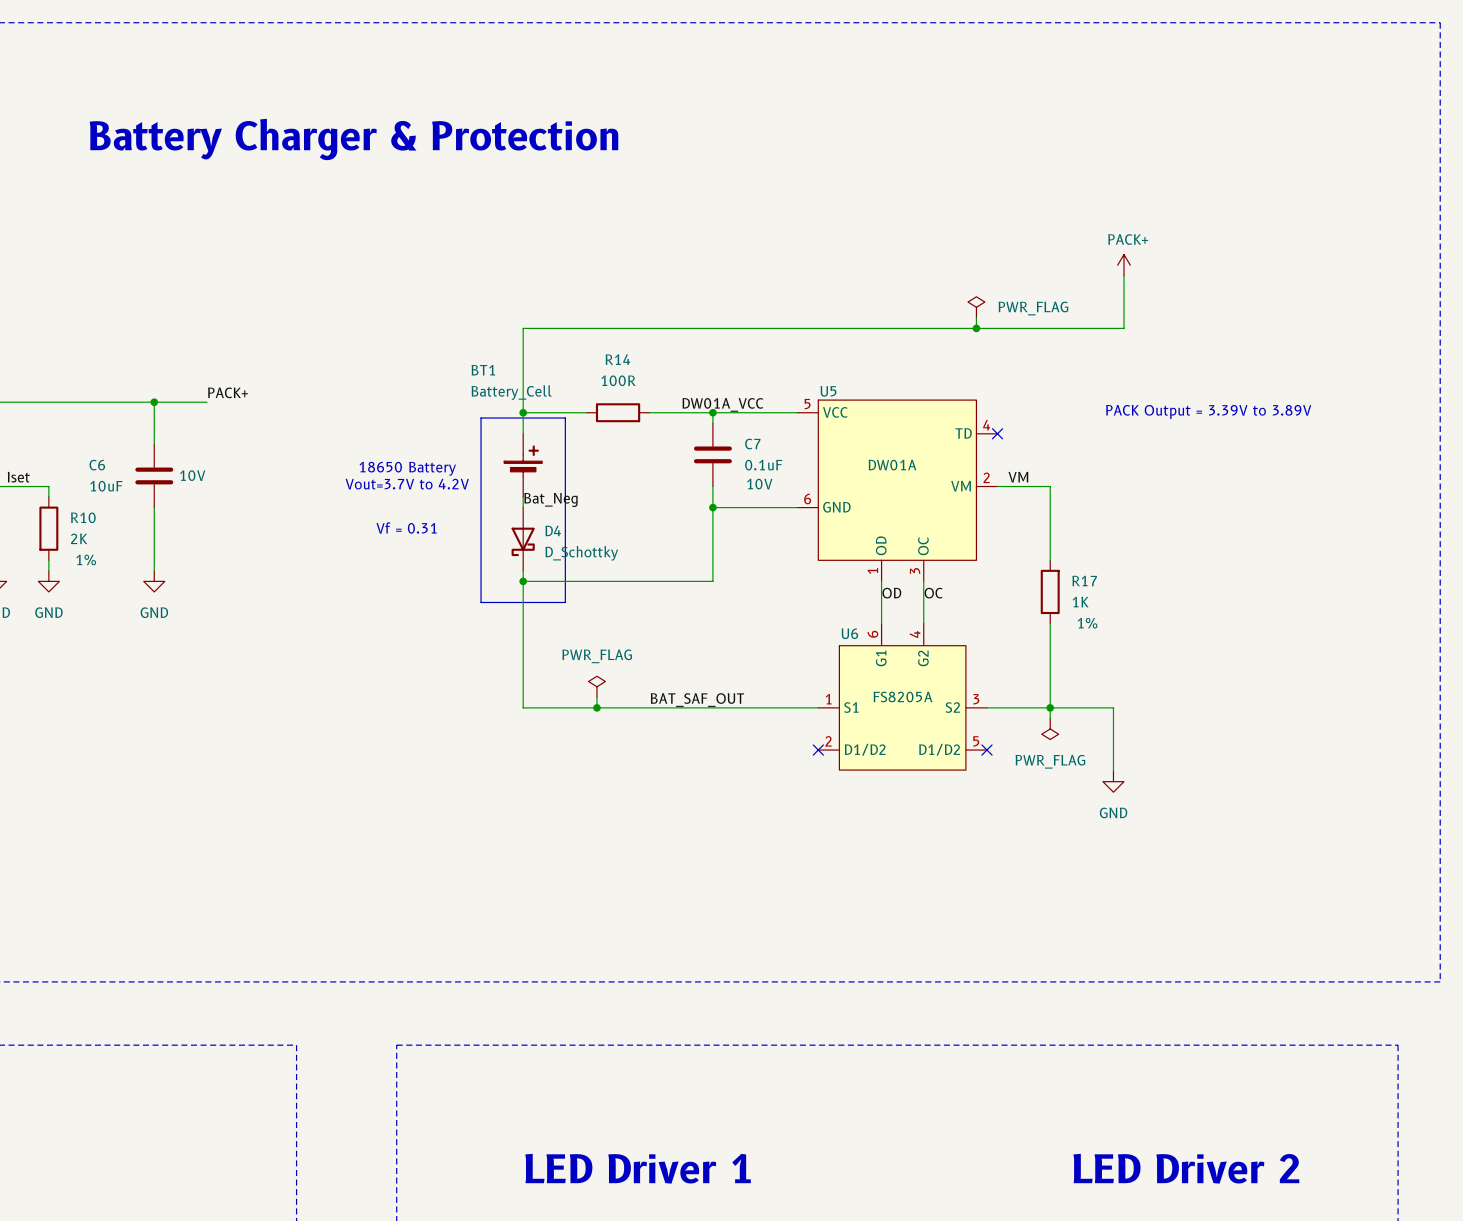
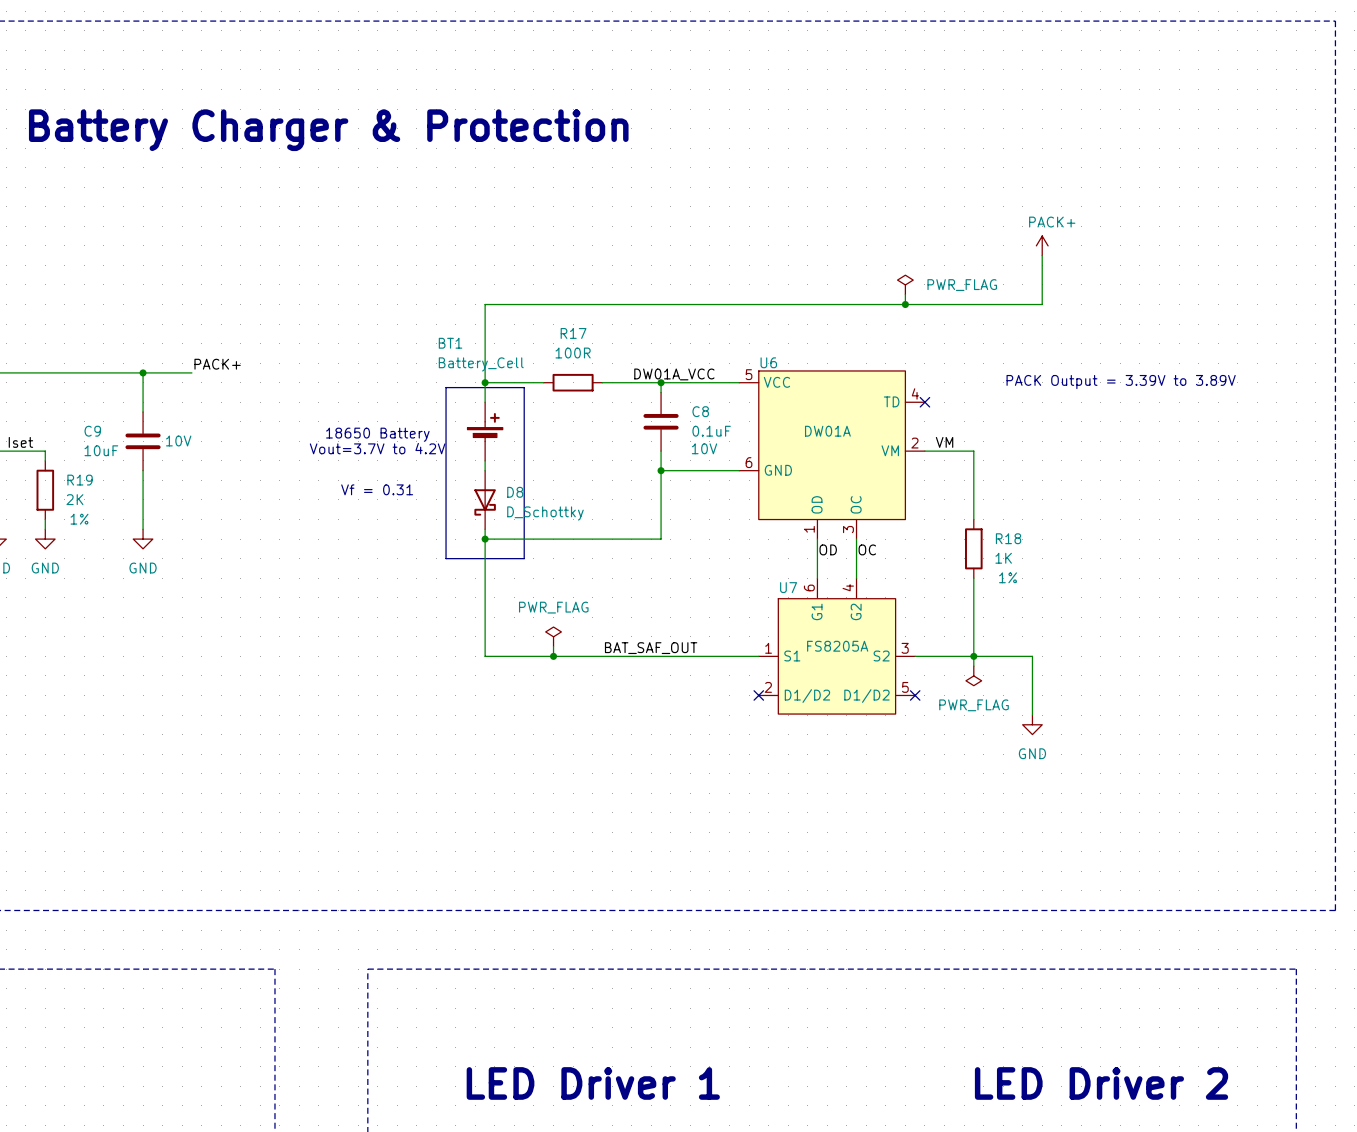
R14 name: R14 (617, 359) -> R17 (573, 333)
U5 name: U5 (828, 391) -> U6 (768, 362)
C7 name: C7 (752, 444) -> C8 (700, 411)
C6 name: C6 (97, 465) -> C9 (92, 431)
label: Bat_Neg (550, 499) -> none
R10 name: R10 (83, 517) -> R19 (80, 480)
D4 name: D4 (553, 530) -> D8 (515, 492)
R17 name: R17 (1084, 580) -> R18 (1008, 538)
U6 name: U6 (849, 633) -> U7 (788, 587)

